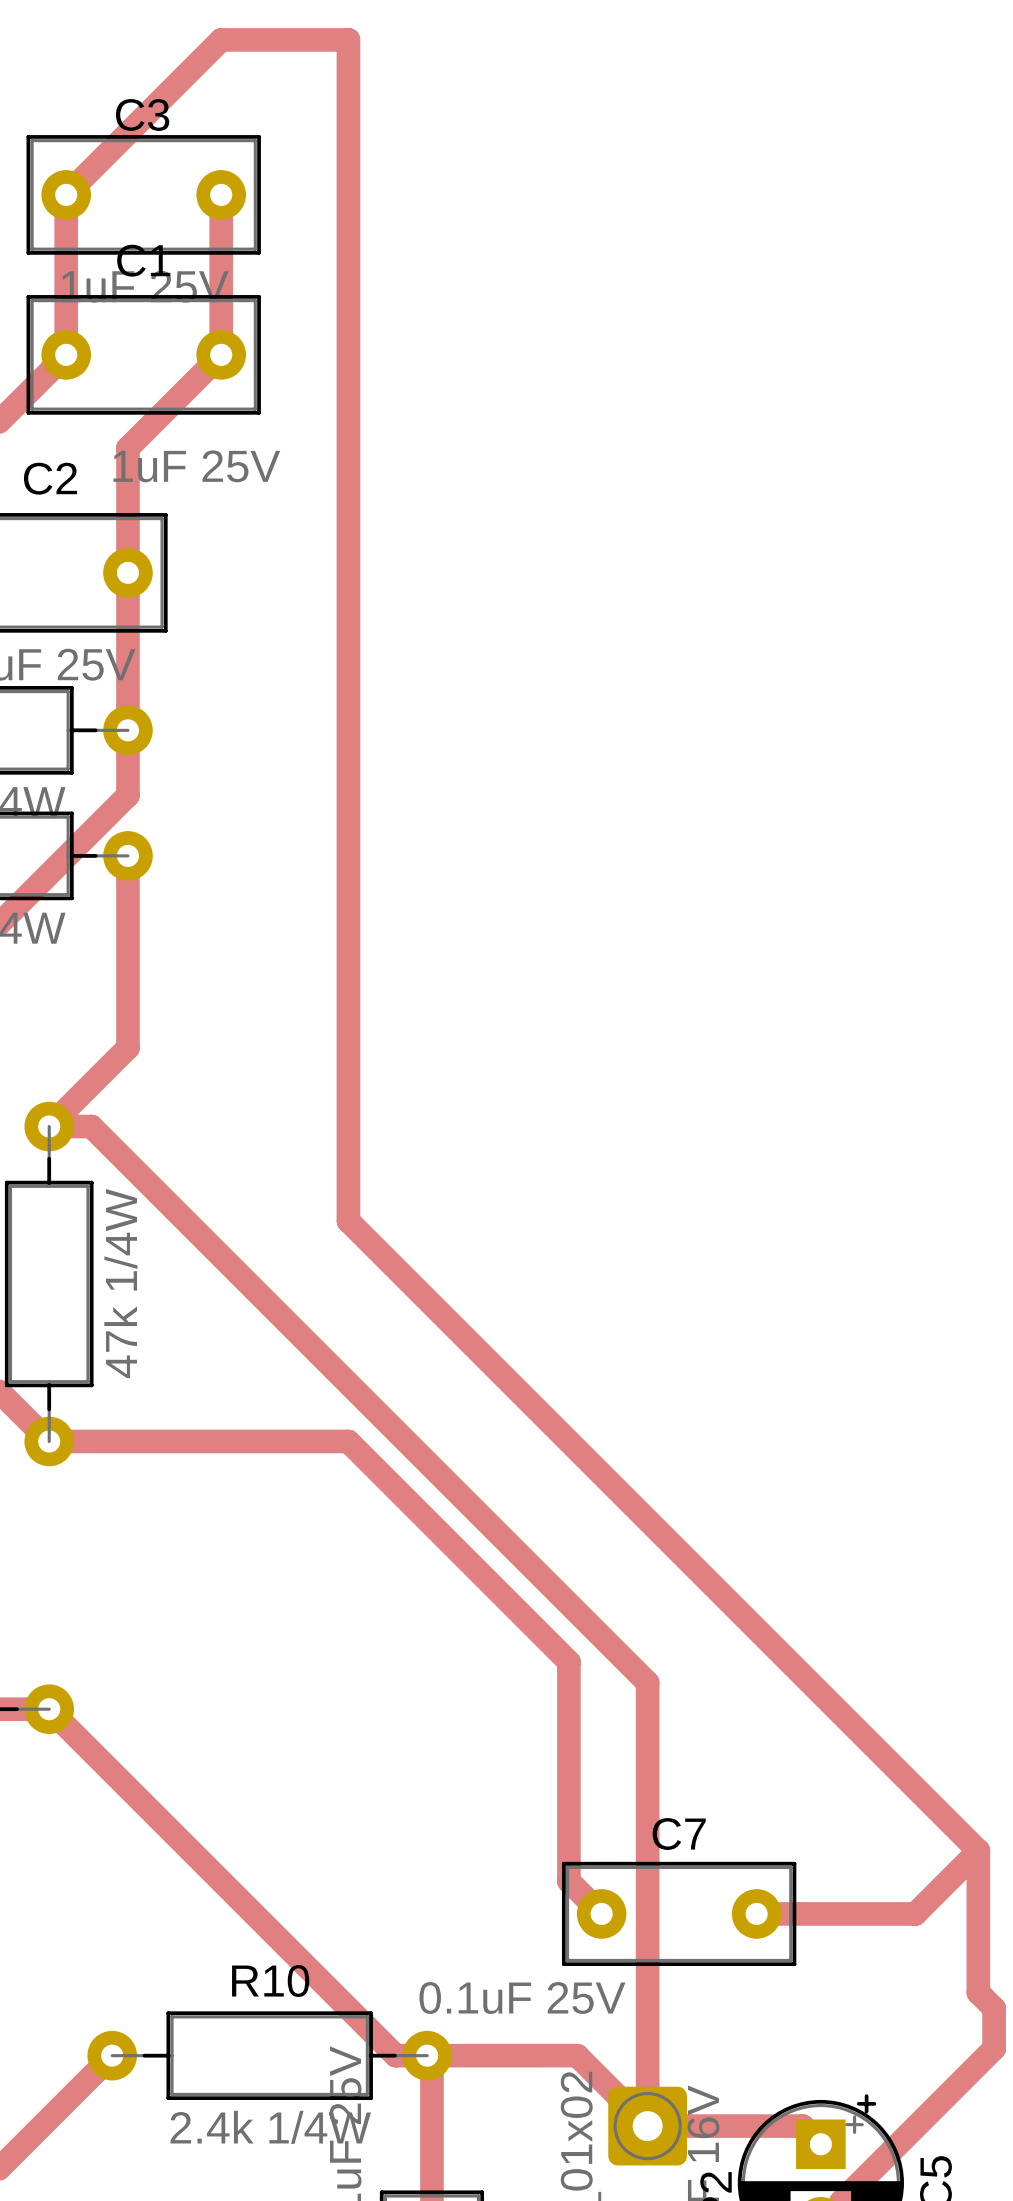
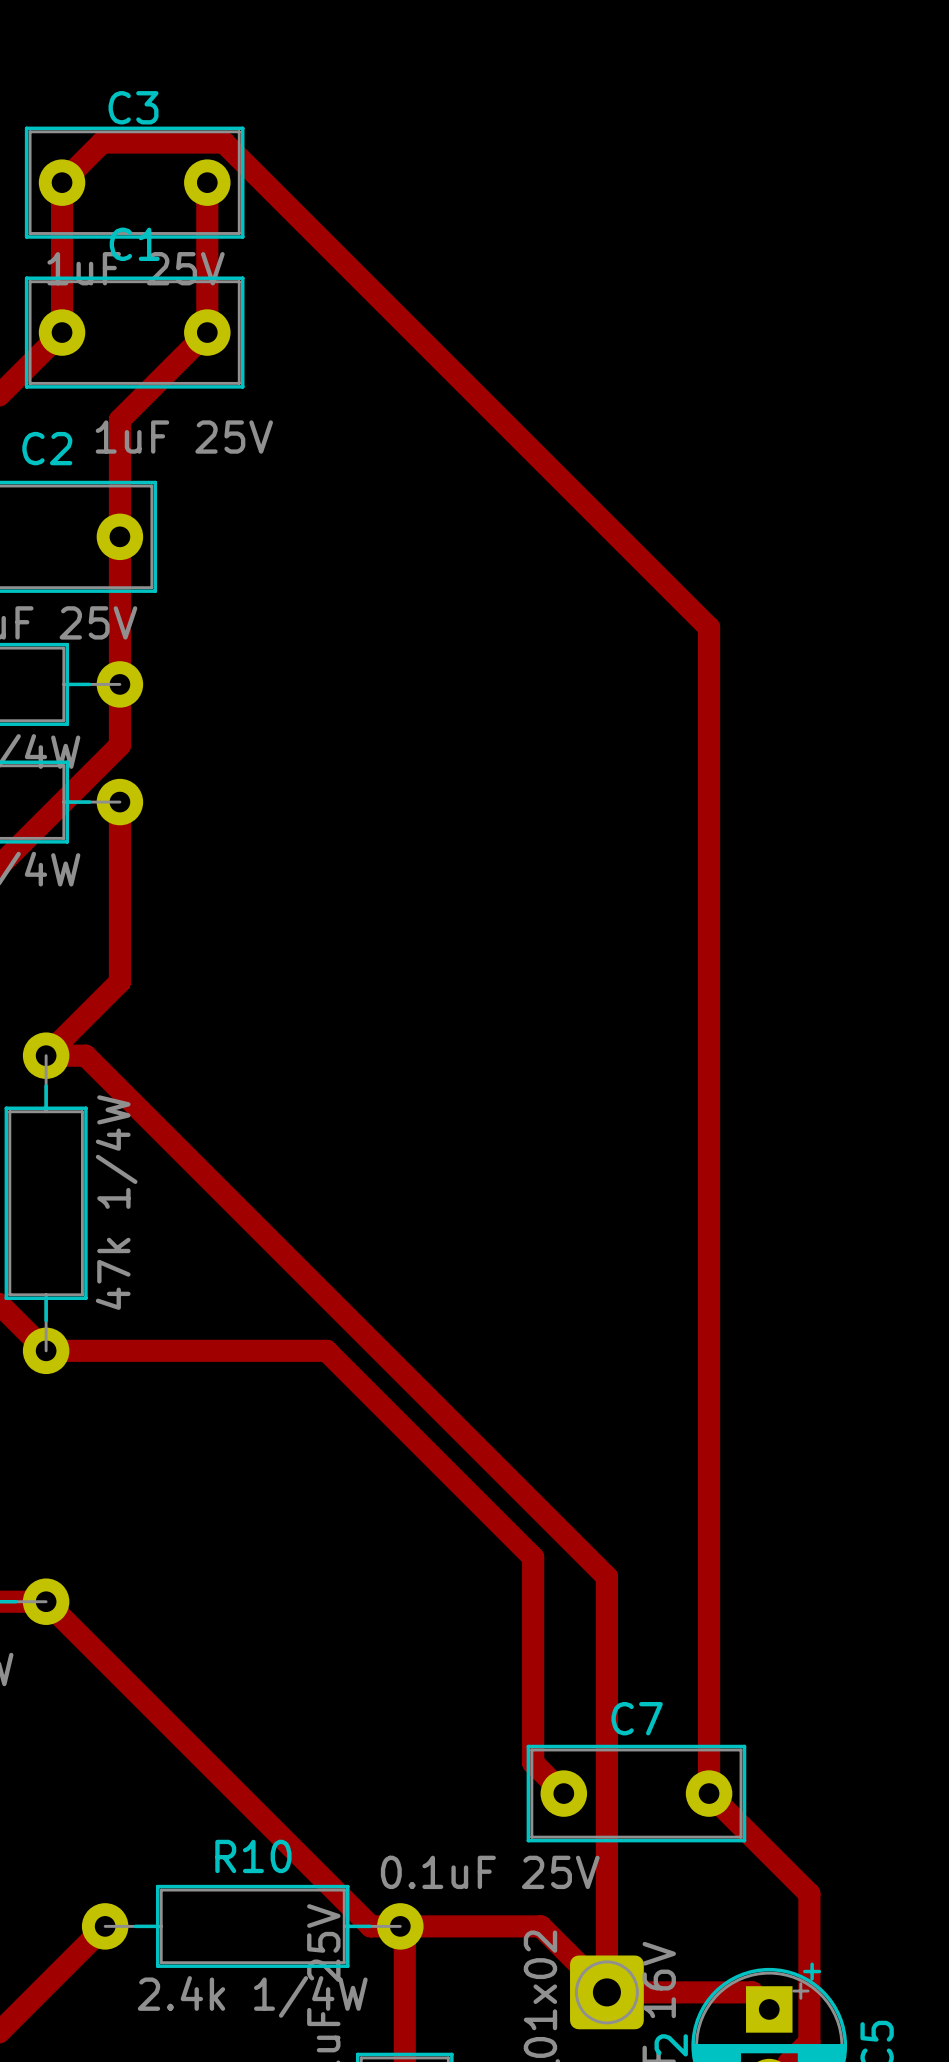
track: (109, 152) (221, 39) (348, 39) (348, 1221) (978, 1850) -> (102, 142) (223, 142) (709, 627) (709, 1793) (809, 1893) (809, 2041)
track: (978, 1850) (978, 1992) (994, 2008) (994, 2048) (863, 2178) -> none
track: (978, 1850) (915, 1913) (756, 1913) -> none

